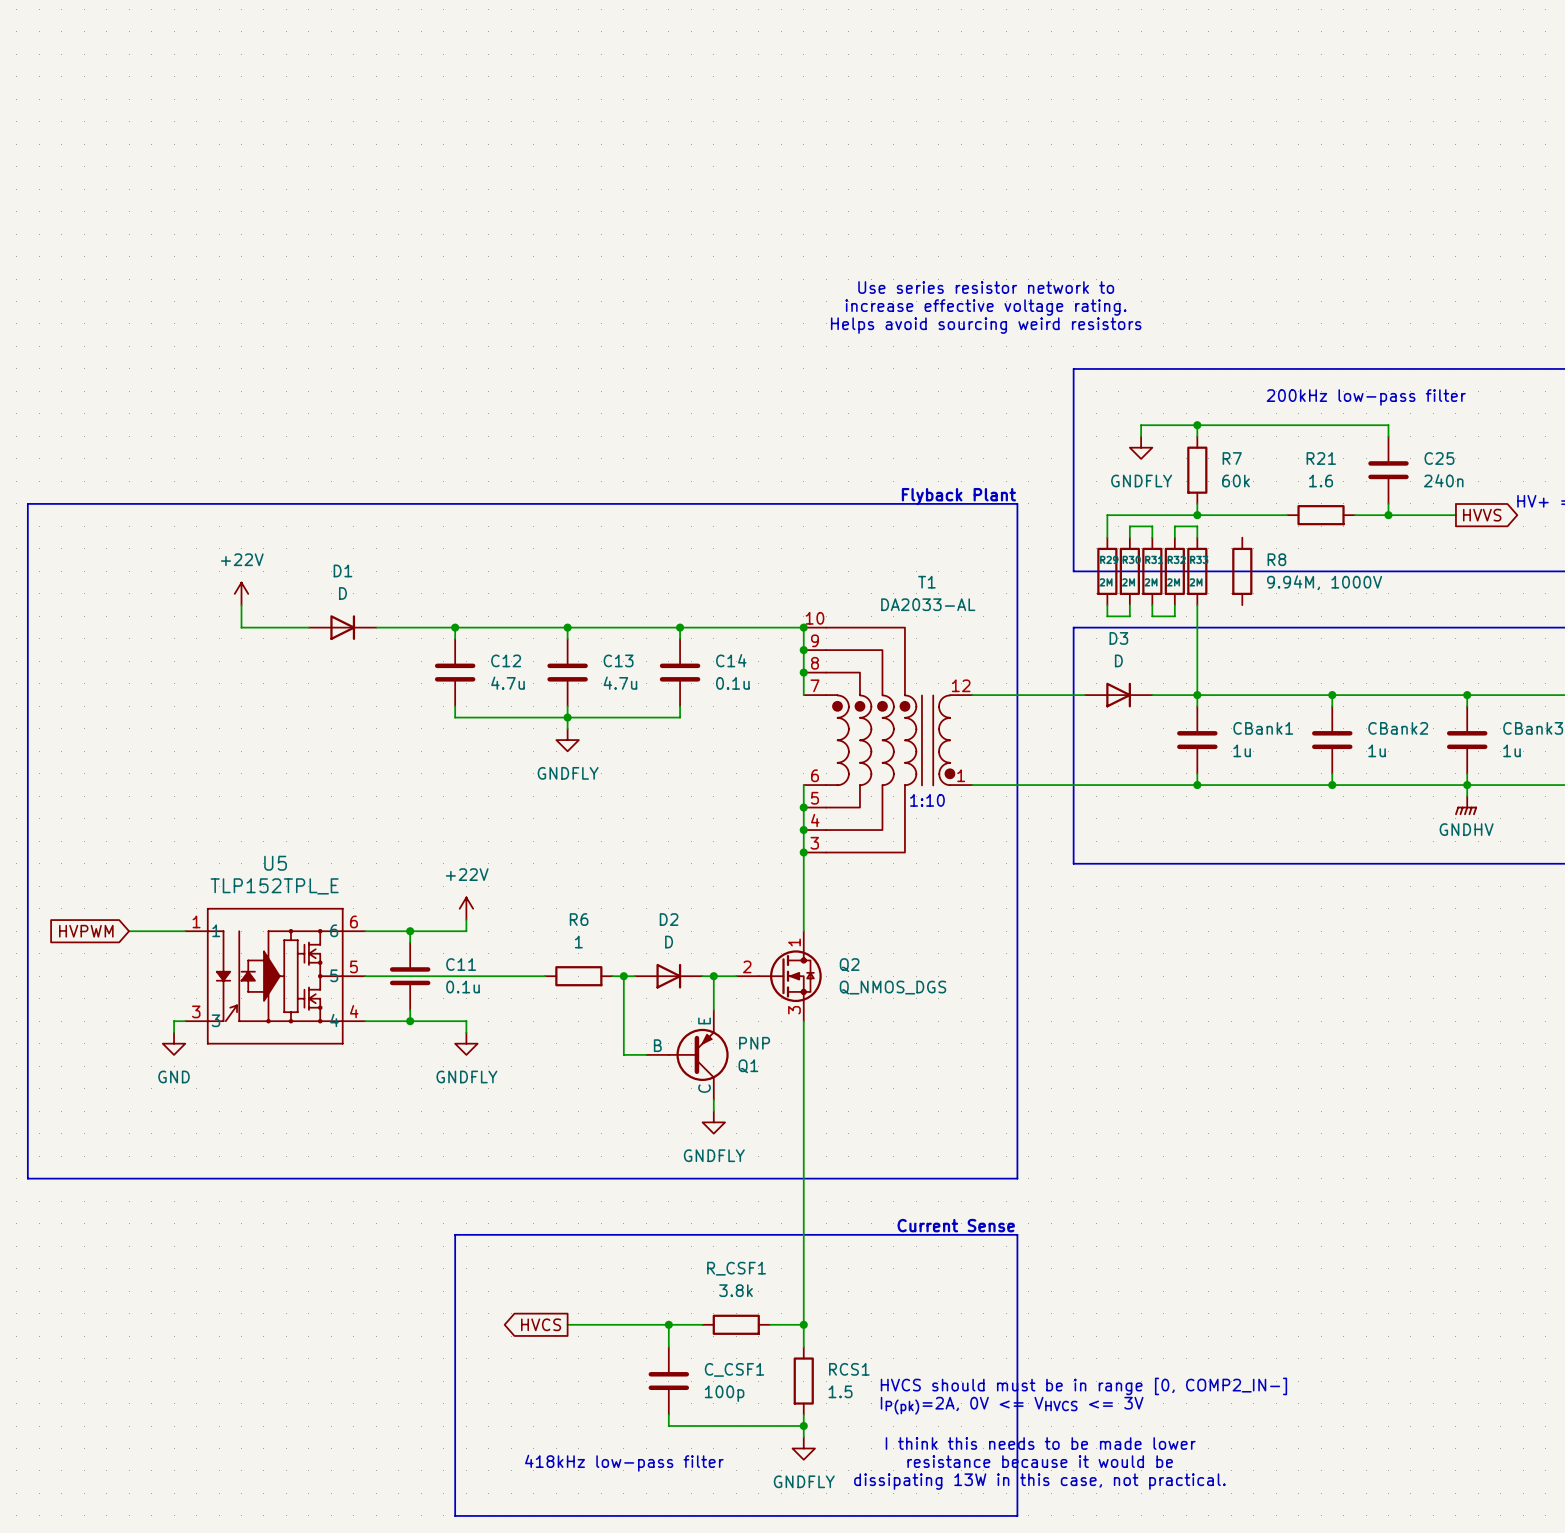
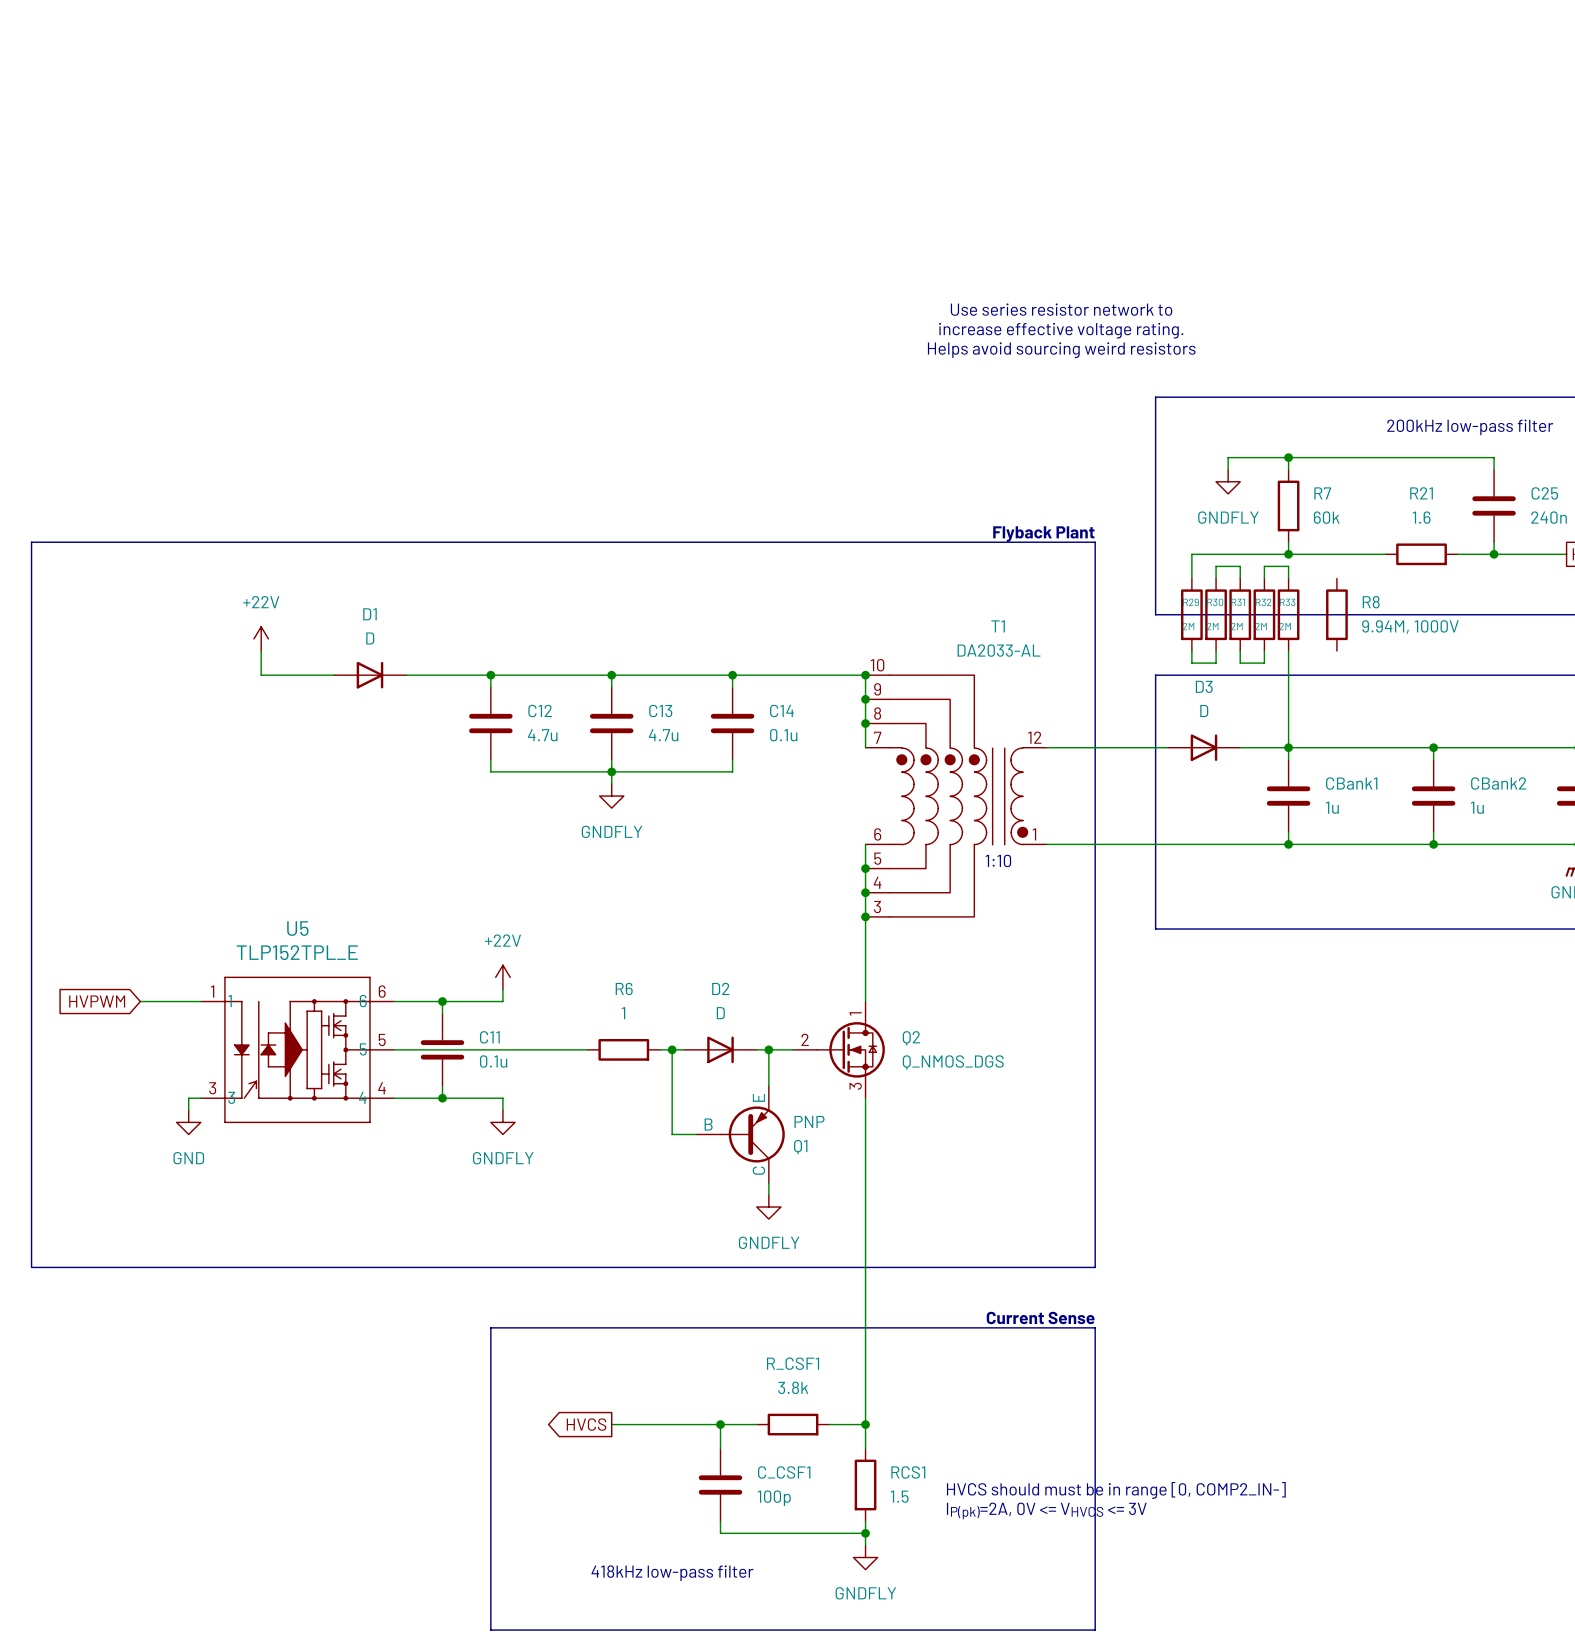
text: I think this needs to be made lower (1040, 1443) -> none
text: resistance because it would be (1040, 1461) -> none
text: dissipating 13W in this case, not practical. (1039, 1481) -> none

